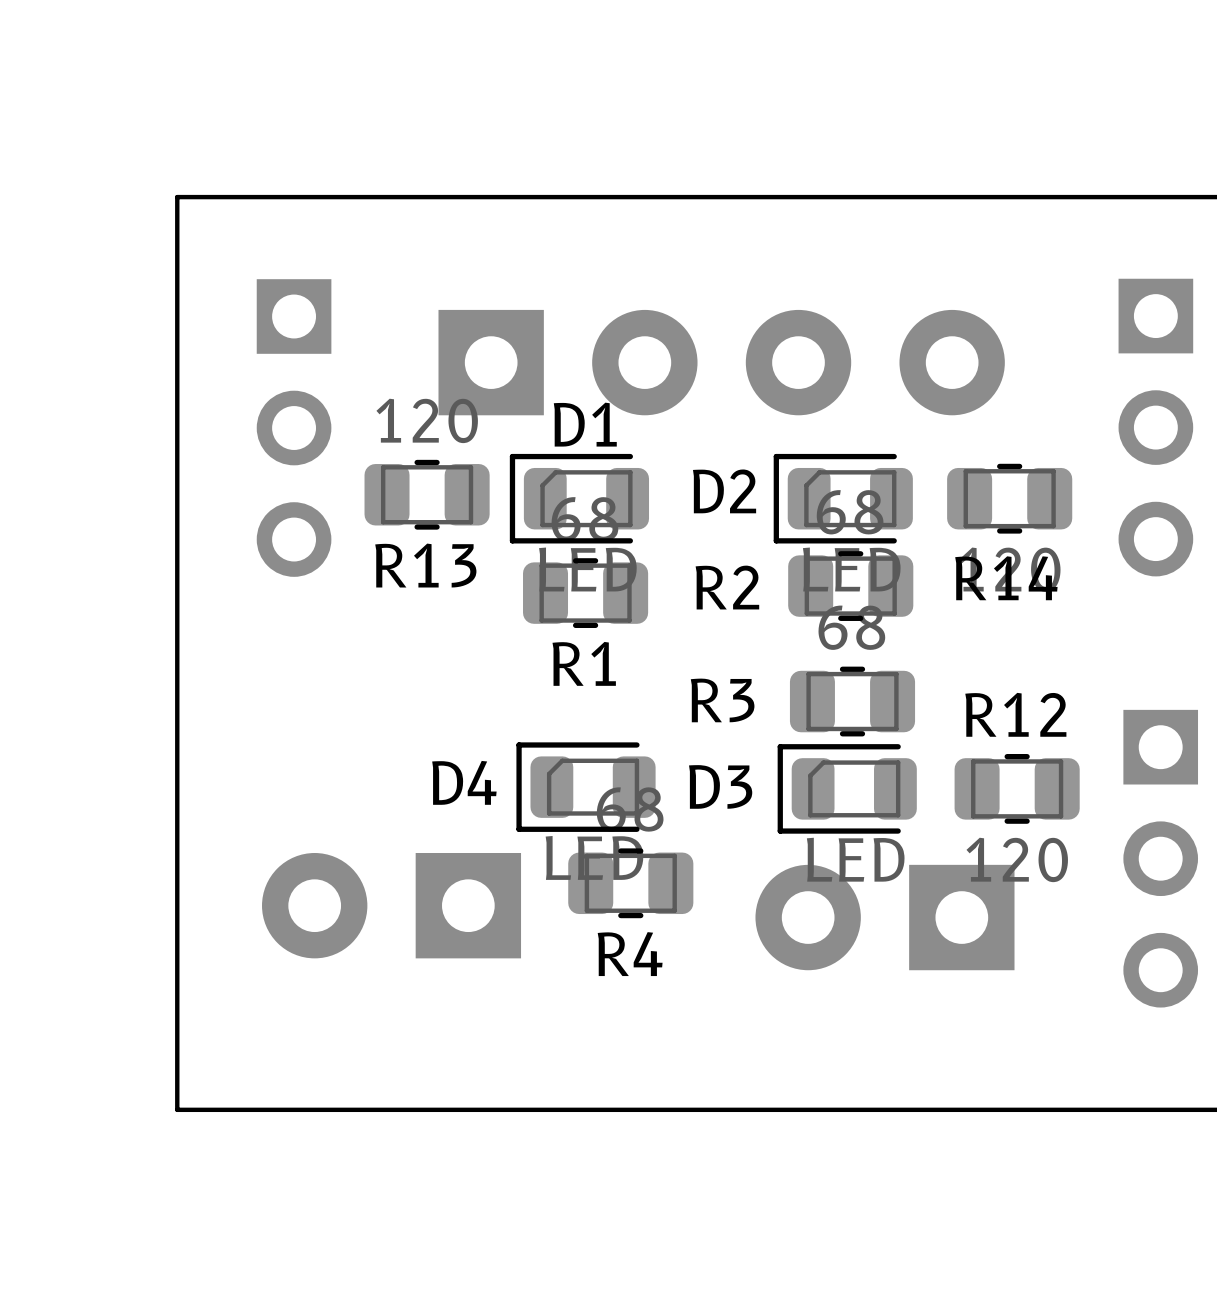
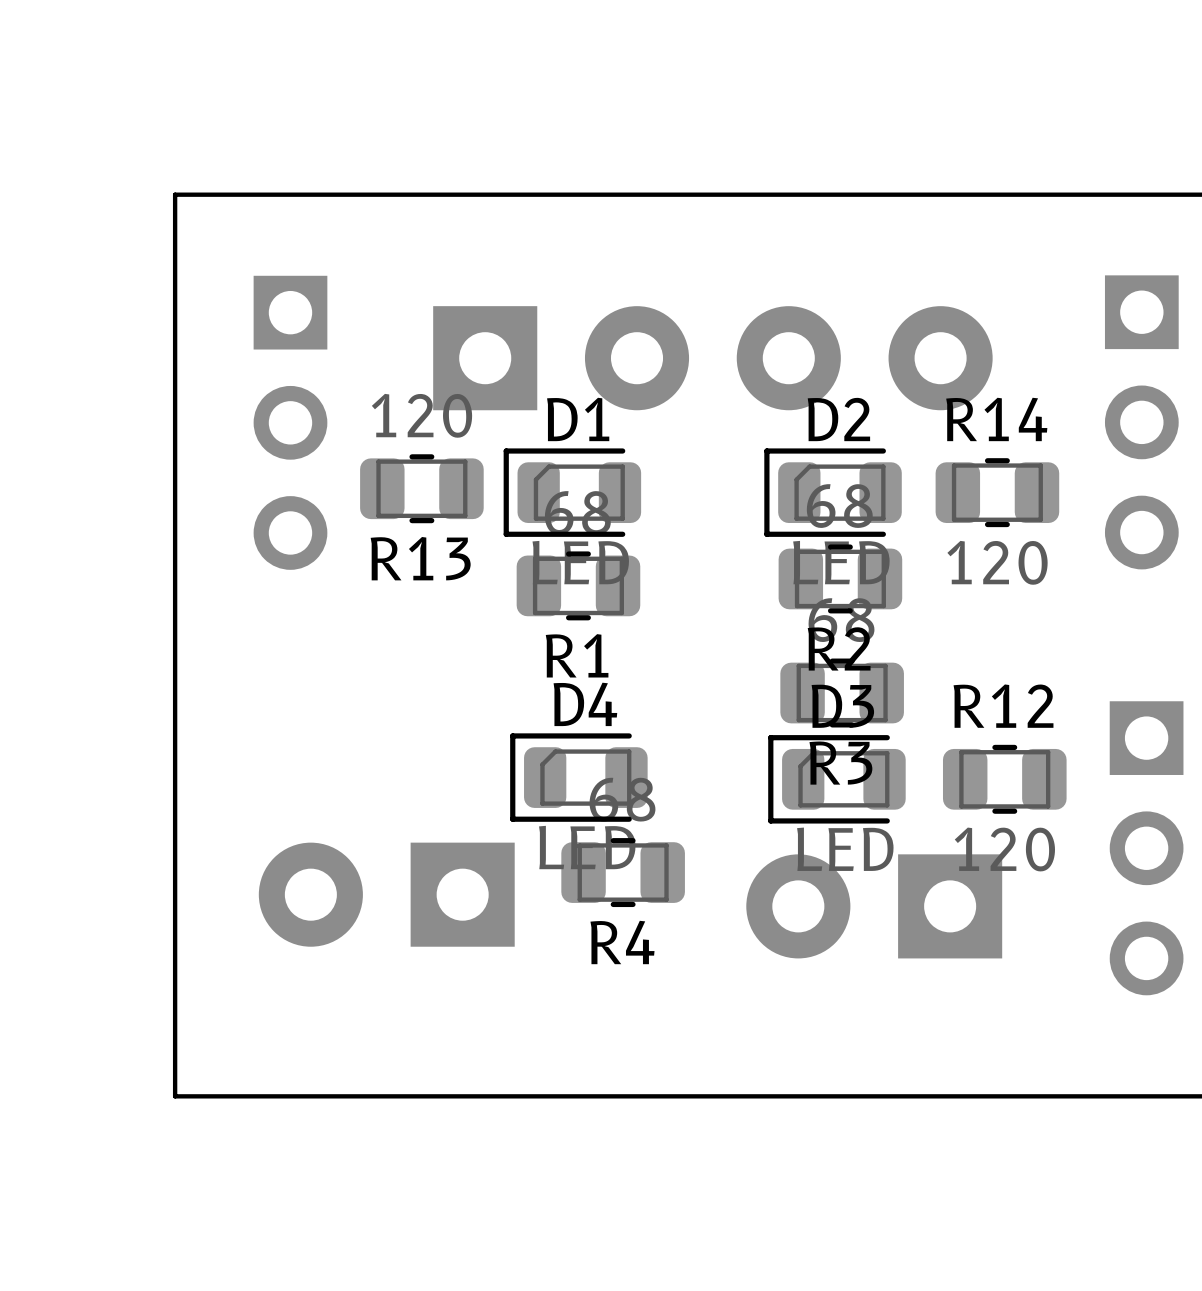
D2 name position: D2 (724, 491) -> D2 (838, 419)
R14 name position: R14 (1006, 578) -> R14 (996, 419)
R2 name position: R2 (727, 587) -> R2 (839, 648)
R3 name position: R3 (722, 700) -> R3 (840, 763)
D4 name position: D4 (464, 782) -> D4 (585, 704)
D3 name position: D3 (720, 786) -> D3 (842, 706)

